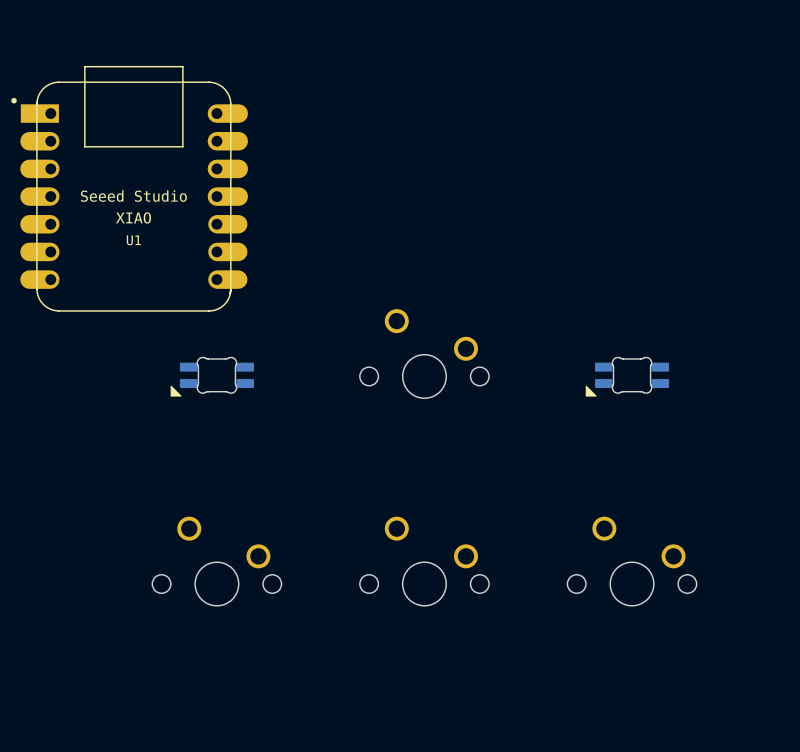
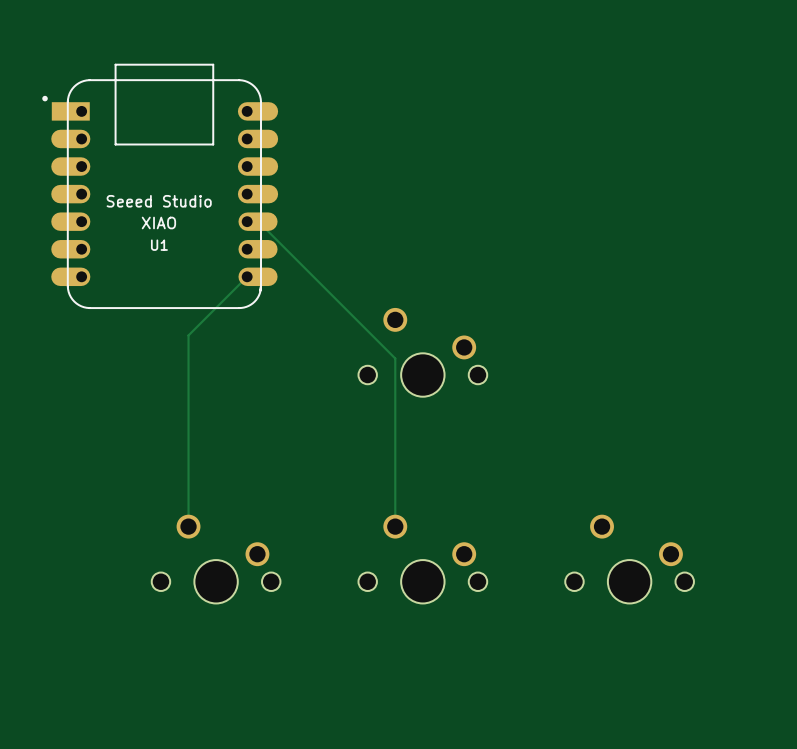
U1 footprint: [11, 65, 248, 312] -> [42, 64, 279, 309]
track: none -> (247, 221) (258, 221) (395, 358) (395, 526)
track: none -> (247, 276) (188, 335) (188, 526)
part: (212, 376) -> none
part: (627, 376) -> none

